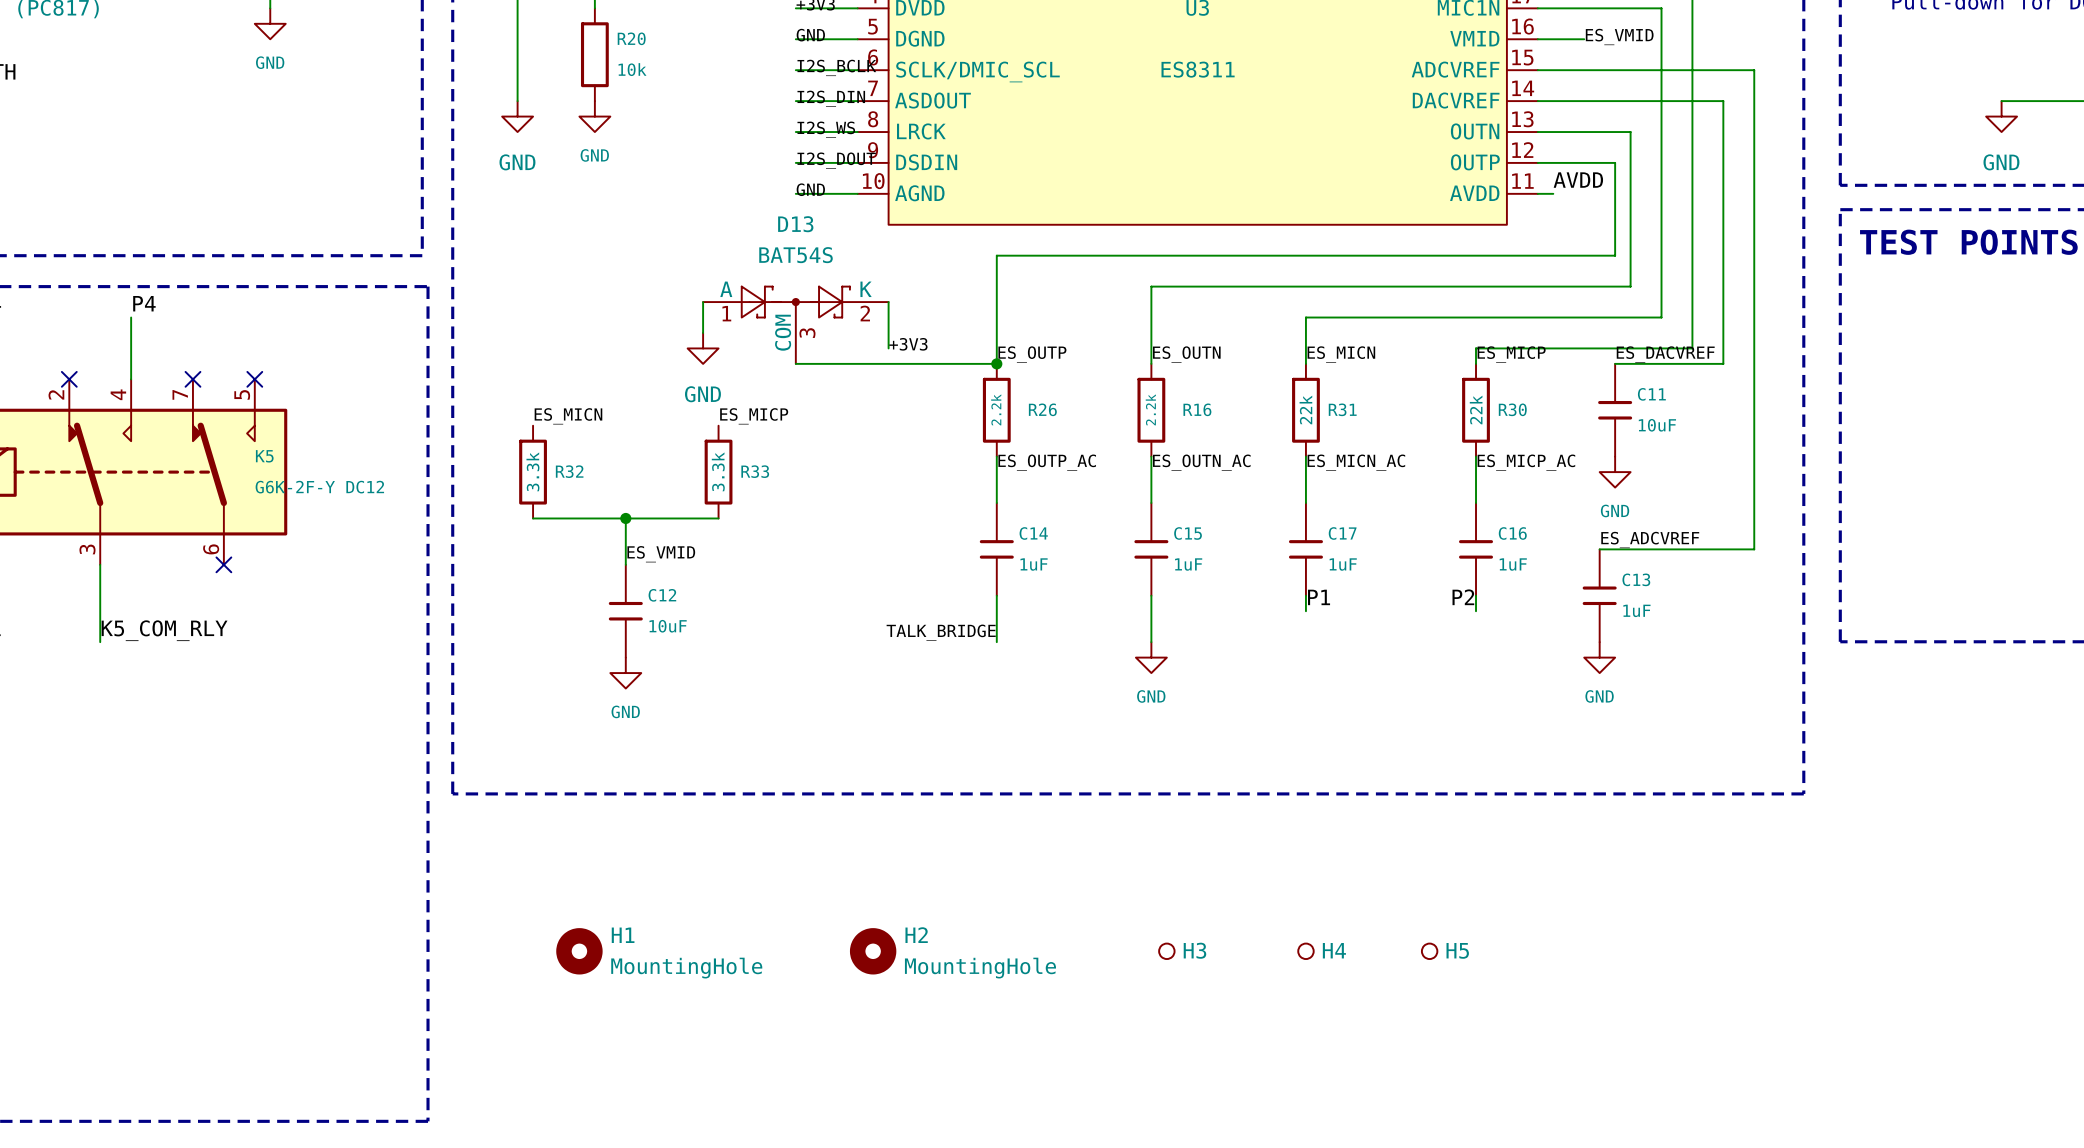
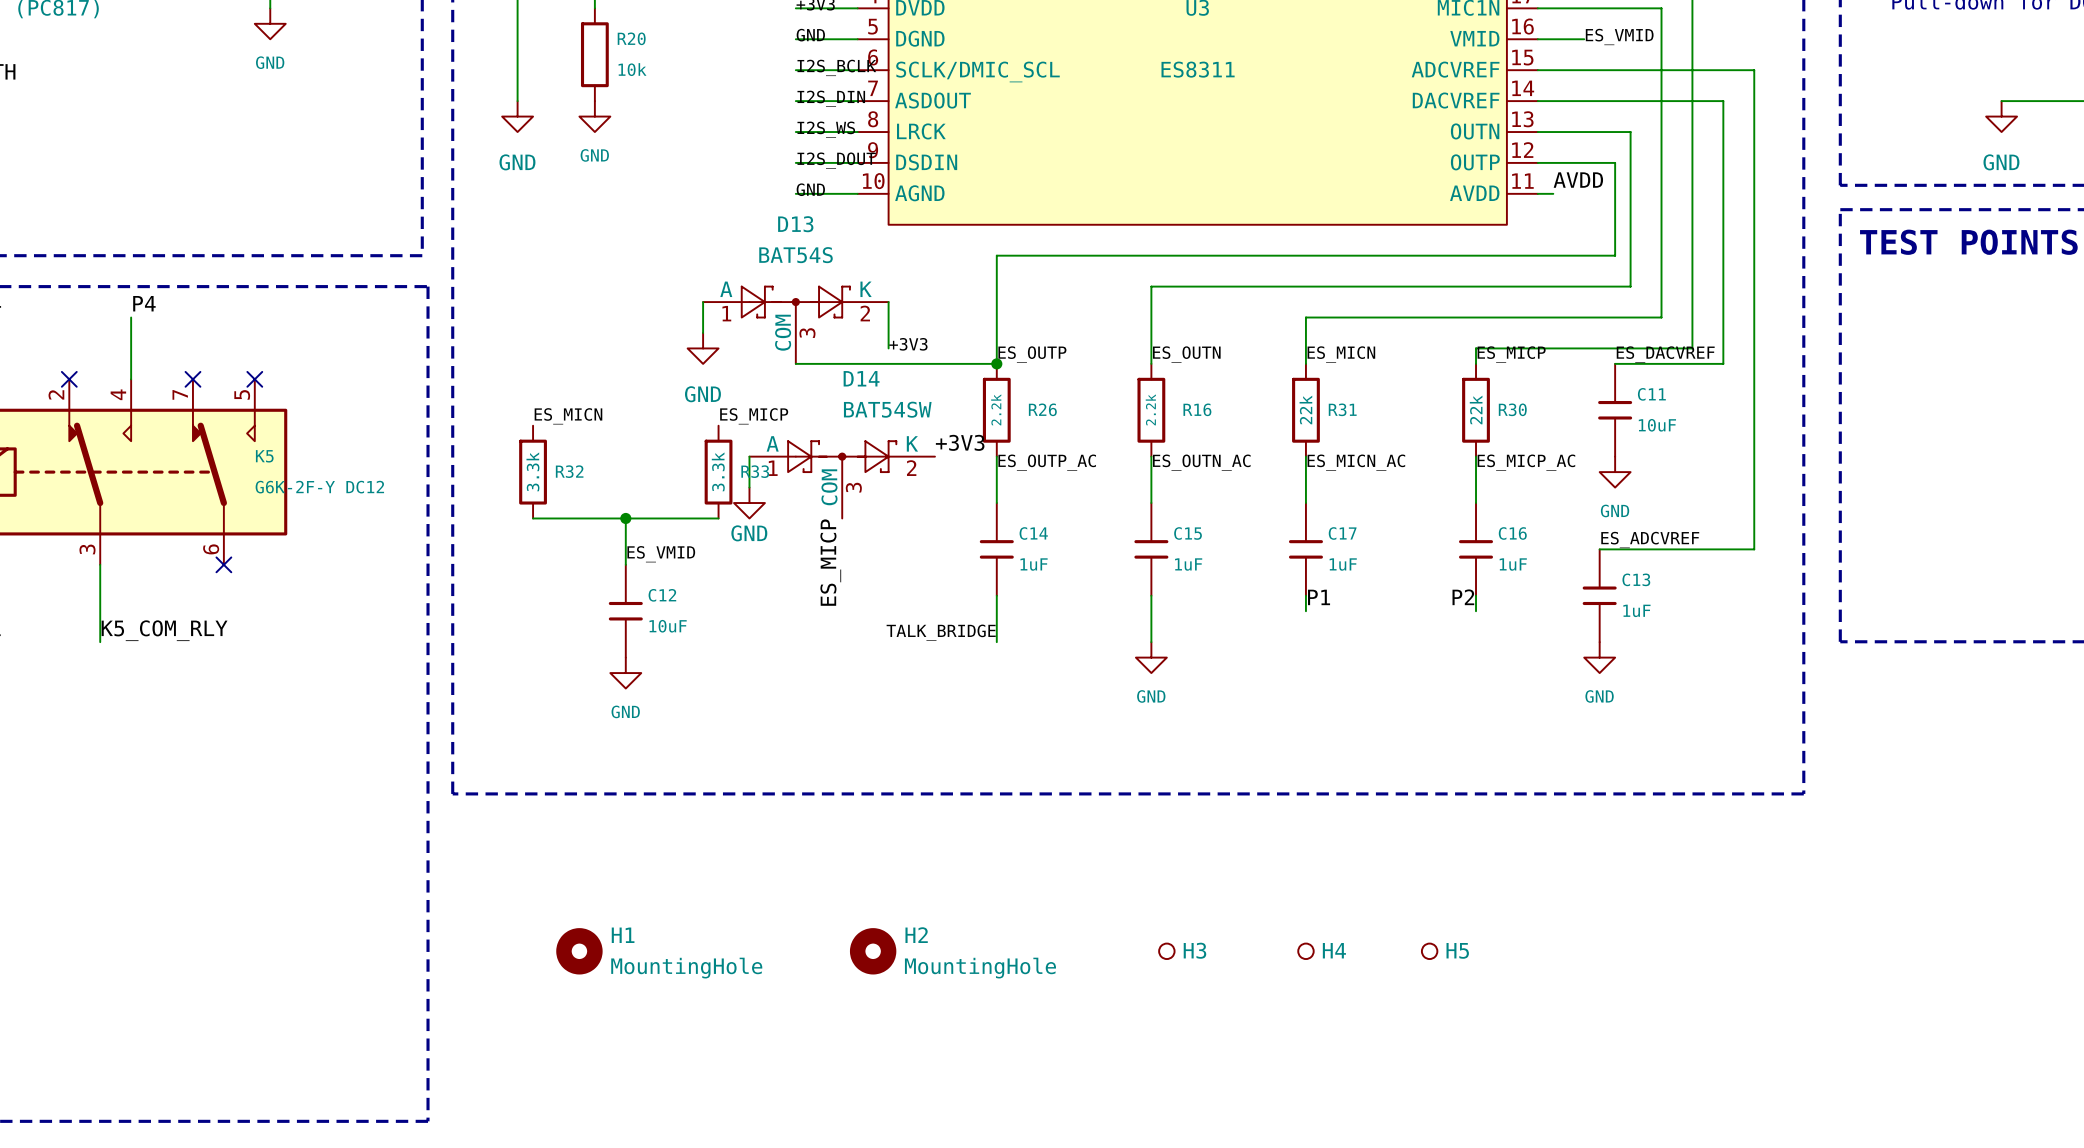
label: none -> +3V3 (960, 442)
wire: none -> (749, 456) (749, 487)
D14: none -> BAT54SW (842, 479)
power symbol: none -> GND (749, 503)
label: none -> ES_MICP (830, 562)

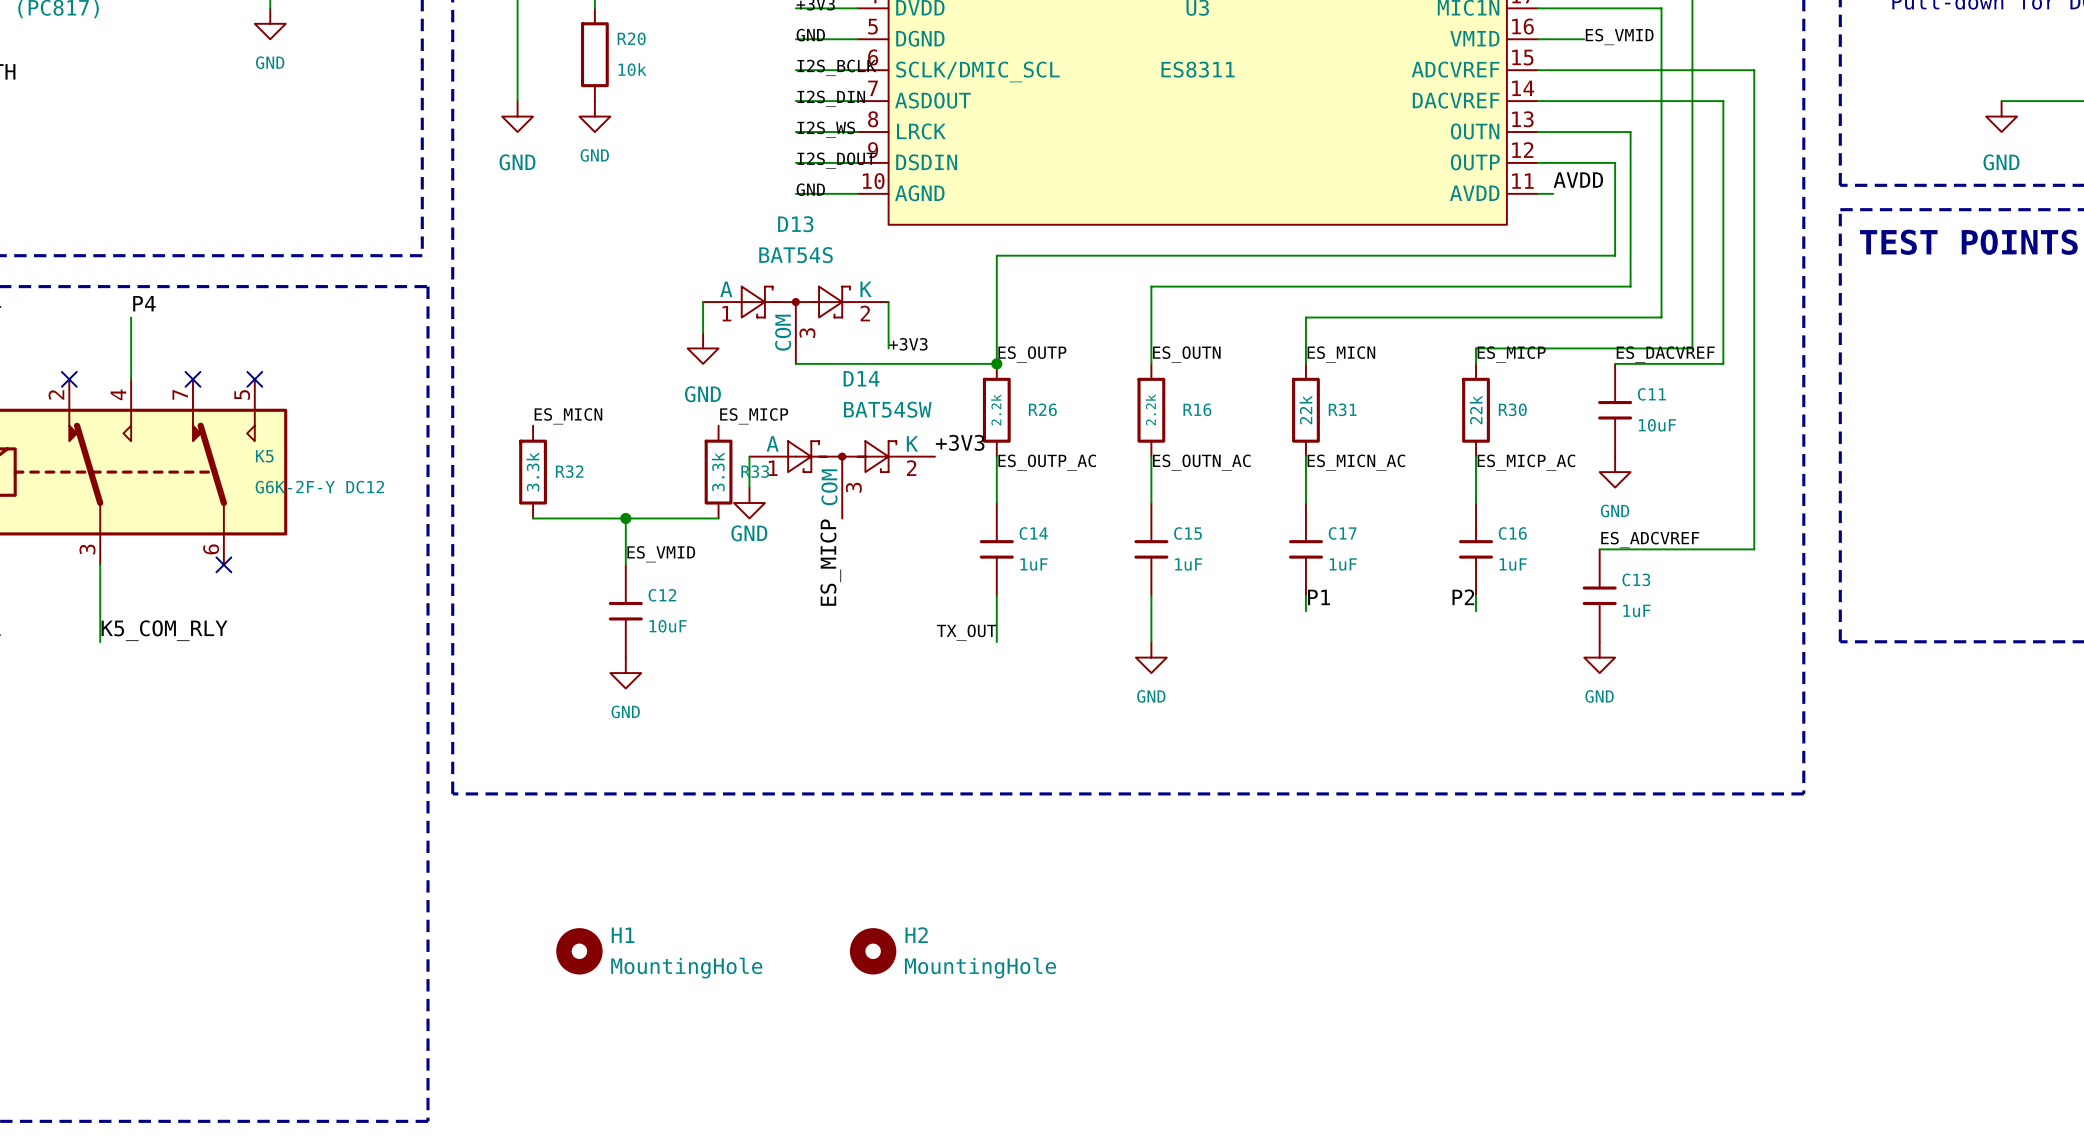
label: TALK_BRIDGE (941, 632) -> TX_OUT (966, 632)
H3: (1166, 951) -> none
H4: (1305, 951) -> none
H5: (1429, 951) -> none

